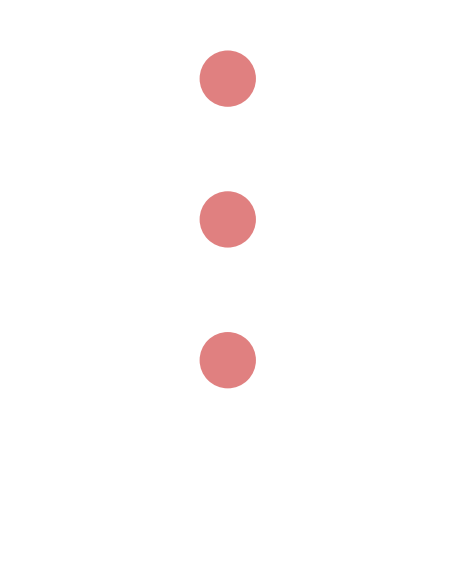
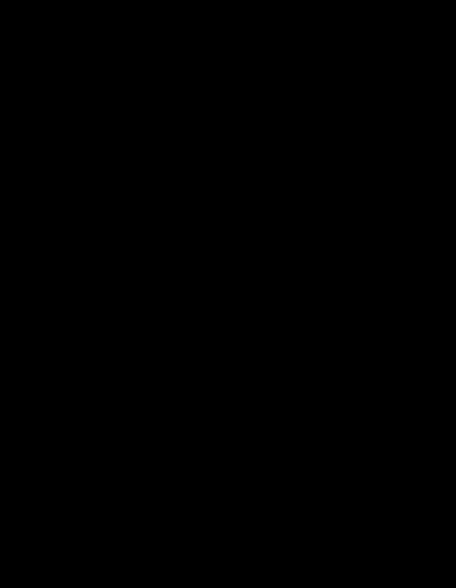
part: (227, 78) -> none
part: (227, 219) -> none
part: (227, 360) -> none

